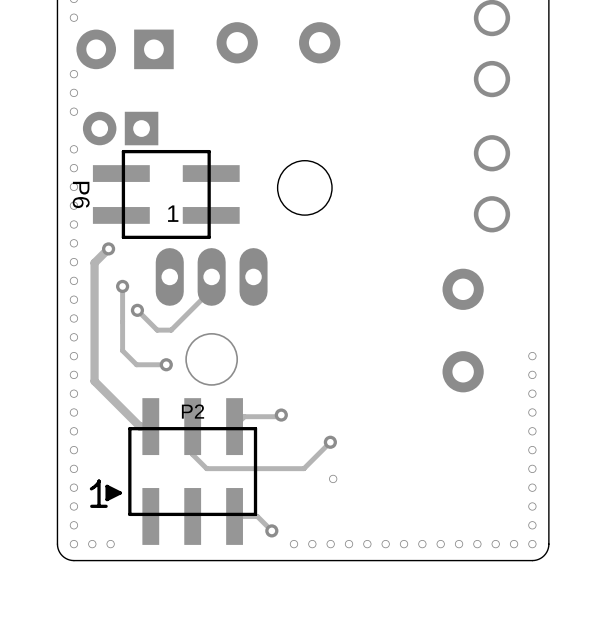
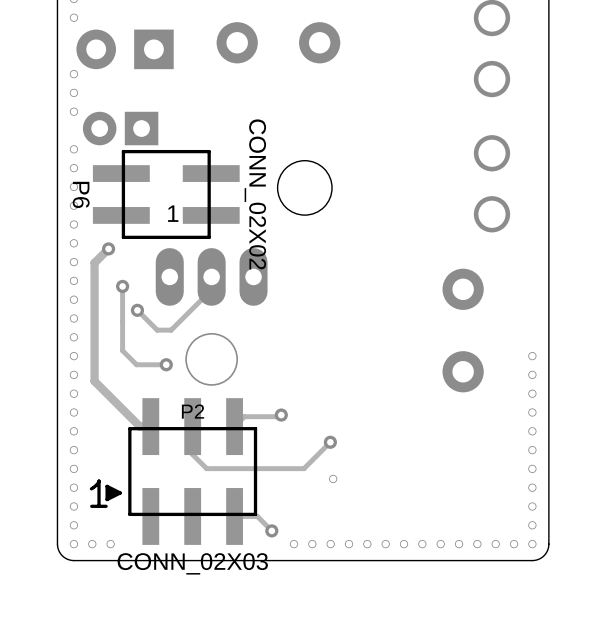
P6 value: none -> CONN_02X02 (255, 194)
P2 value: none -> CONN_02X03 (192, 563)

